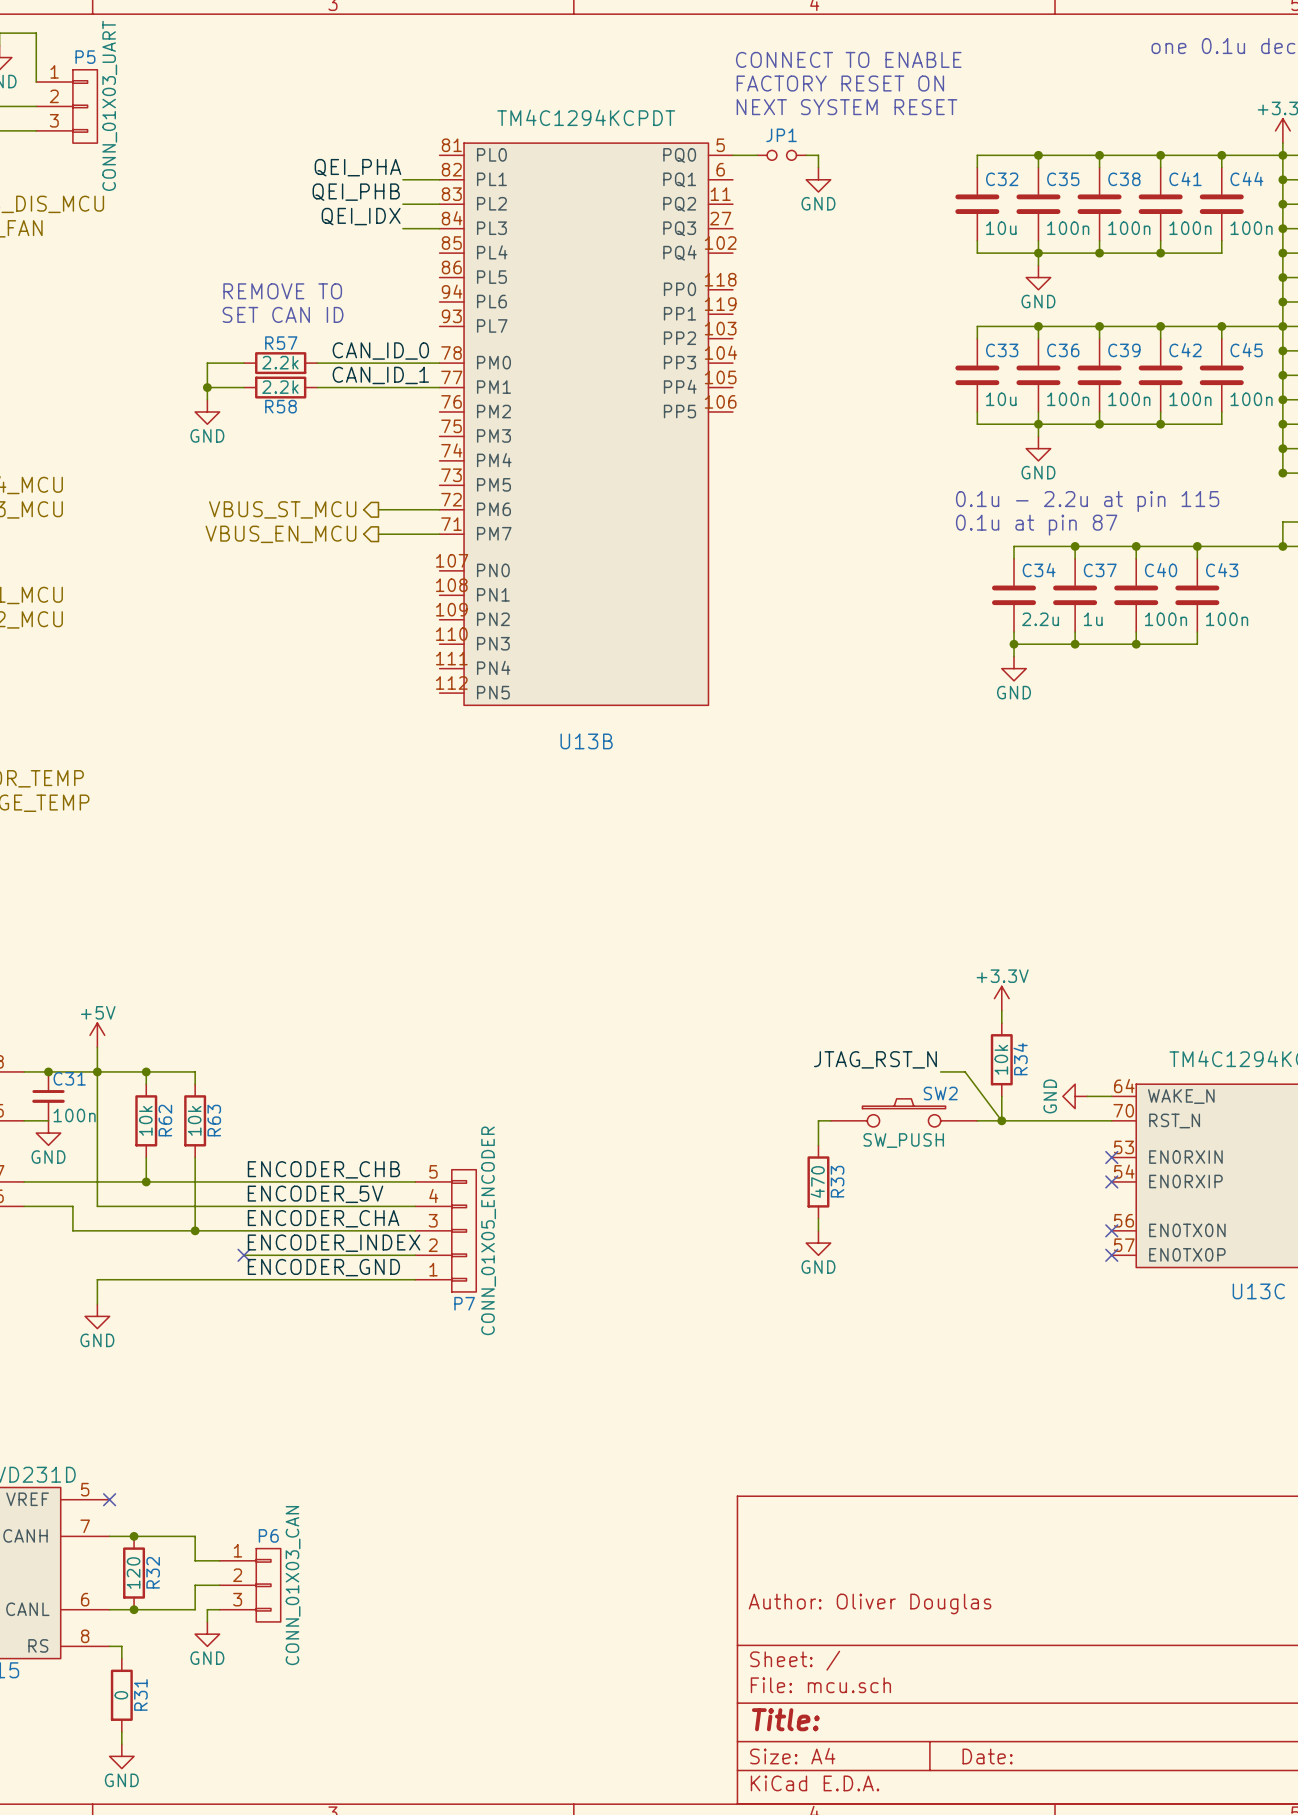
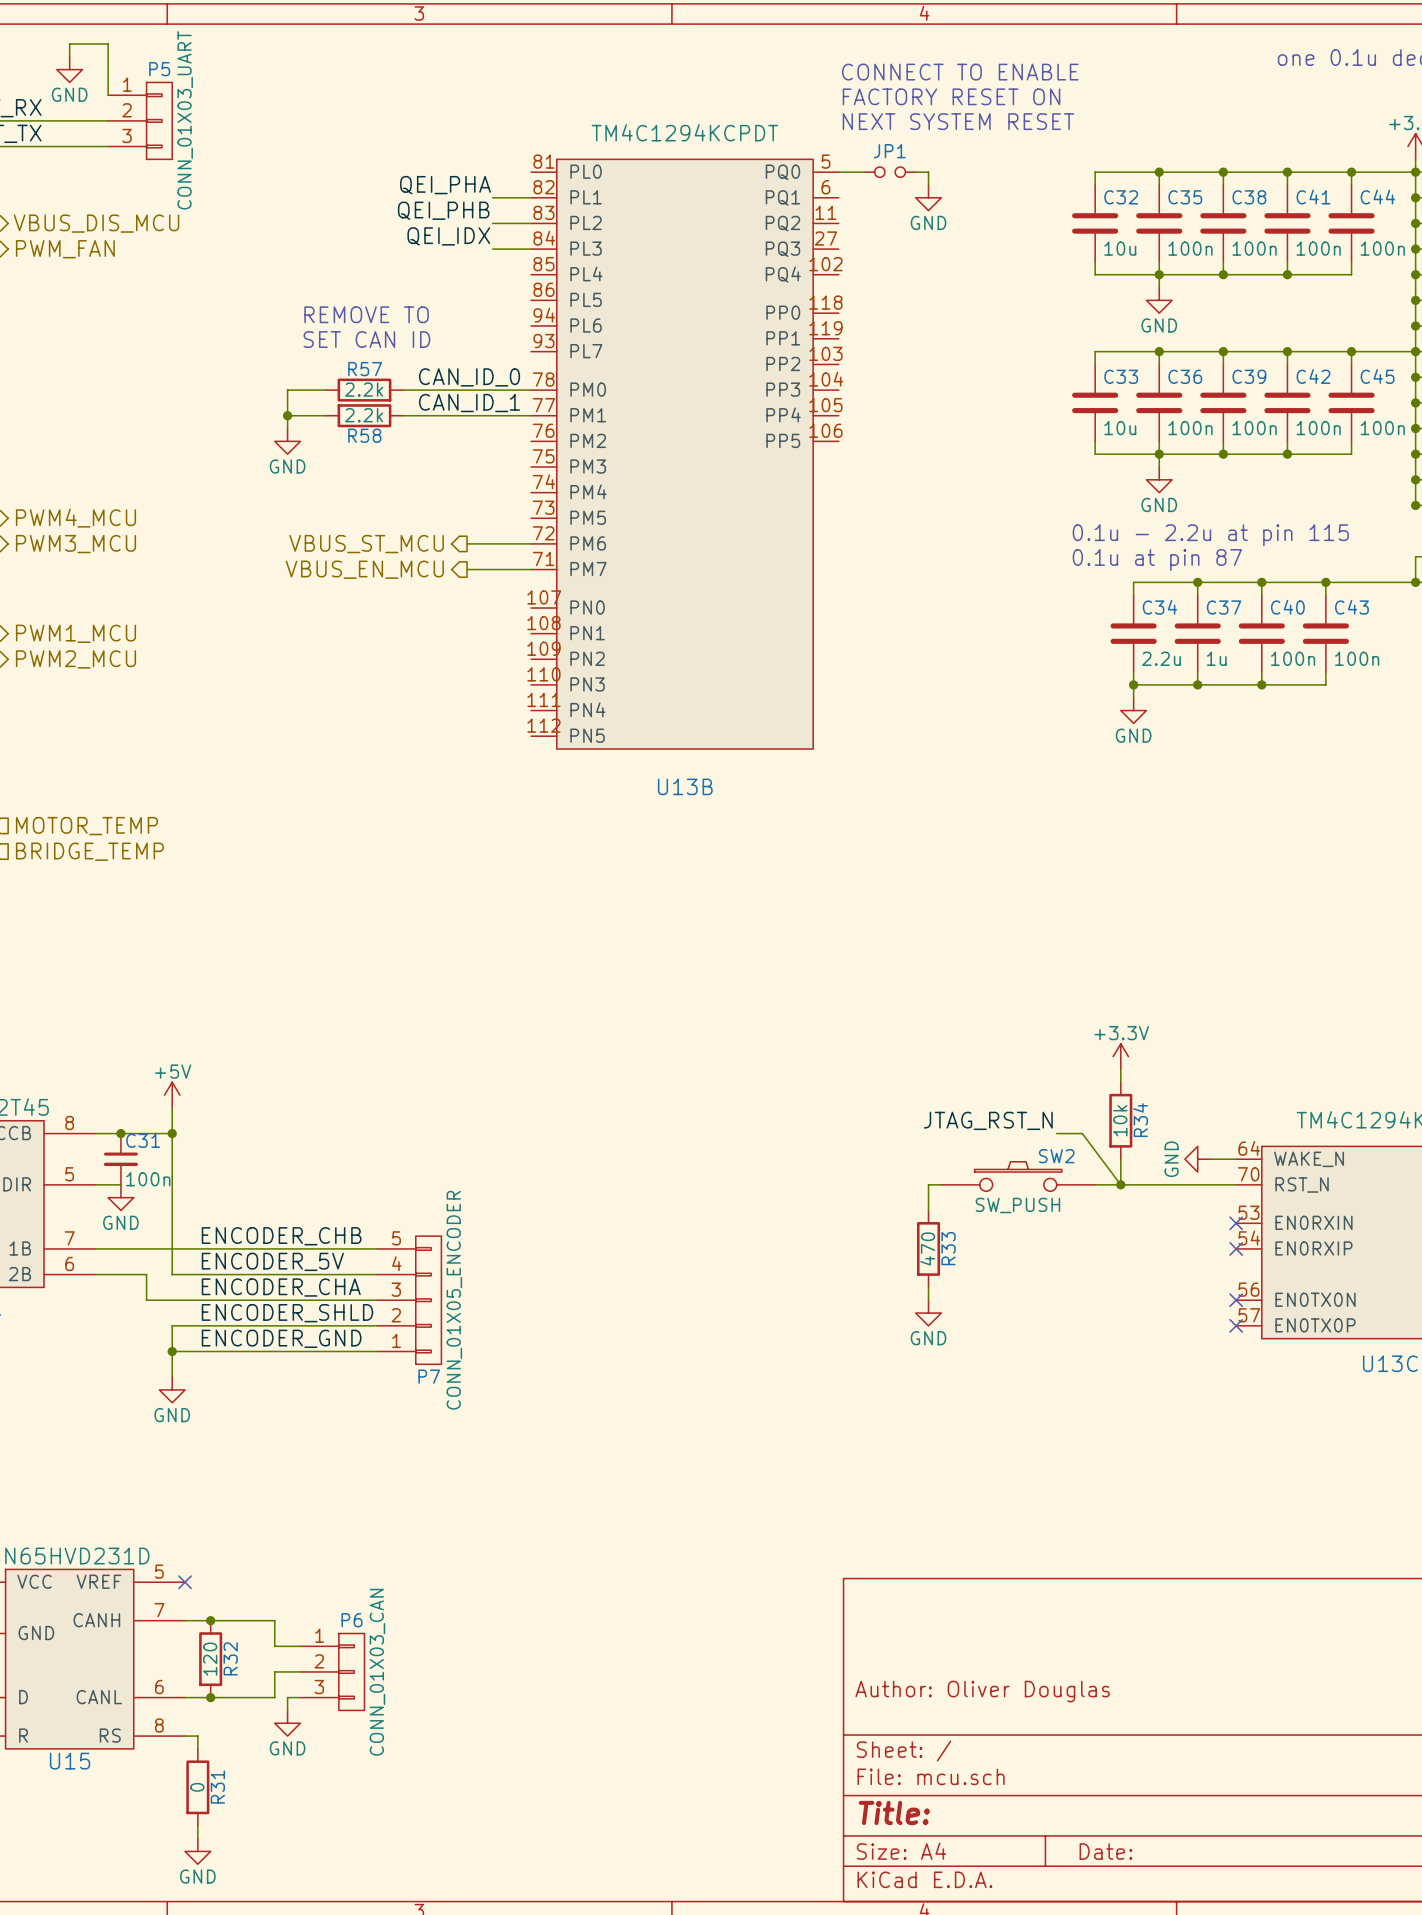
wire: (97, 1071) (195, 1071) (195, 1084) -> none
wire: (146, 1071) (146, 1084) -> none
junction: (146, 1071) -> none
R62: 10k (146, 1120) -> none
R63: 10k (195, 1120) -> none
wire: (146, 1157) (146, 1181) -> none
wire: (195, 1157) (195, 1230) -> none
label position: ENCODER_CHB (323, 1169) -> ENCODER_CHB (281, 1236)
junction: (146, 1181) -> none
wire: (292, 1181) (415, 1181) -> none
label position: ENCODER_5V (315, 1194) -> ENCODER_5V (272, 1261)
wire: (292, 1206) (415, 1206) -> none
label position: ENCODER_CHA (323, 1218) -> ENCODER_CHA (281, 1287)
junction: (195, 1230) -> none
wire: (292, 1230) (415, 1230) -> none
P7 position: (445, 1230) -> (409, 1300)
label: ENCODER_INDEX (334, 1243) -> ENCODER_SHLD (287, 1313)
wire: none -> (326, 1325) (172, 1325) (172, 1351)
no-connect mark: (244, 1255) -> none
wire: (292, 1255) (415, 1255) -> none
label position: ENCODER_GND (323, 1267) -> ENCODER_GND (281, 1338)
junction: none -> (172, 1351)
wire: (292, 1279) (415, 1279) -> none

